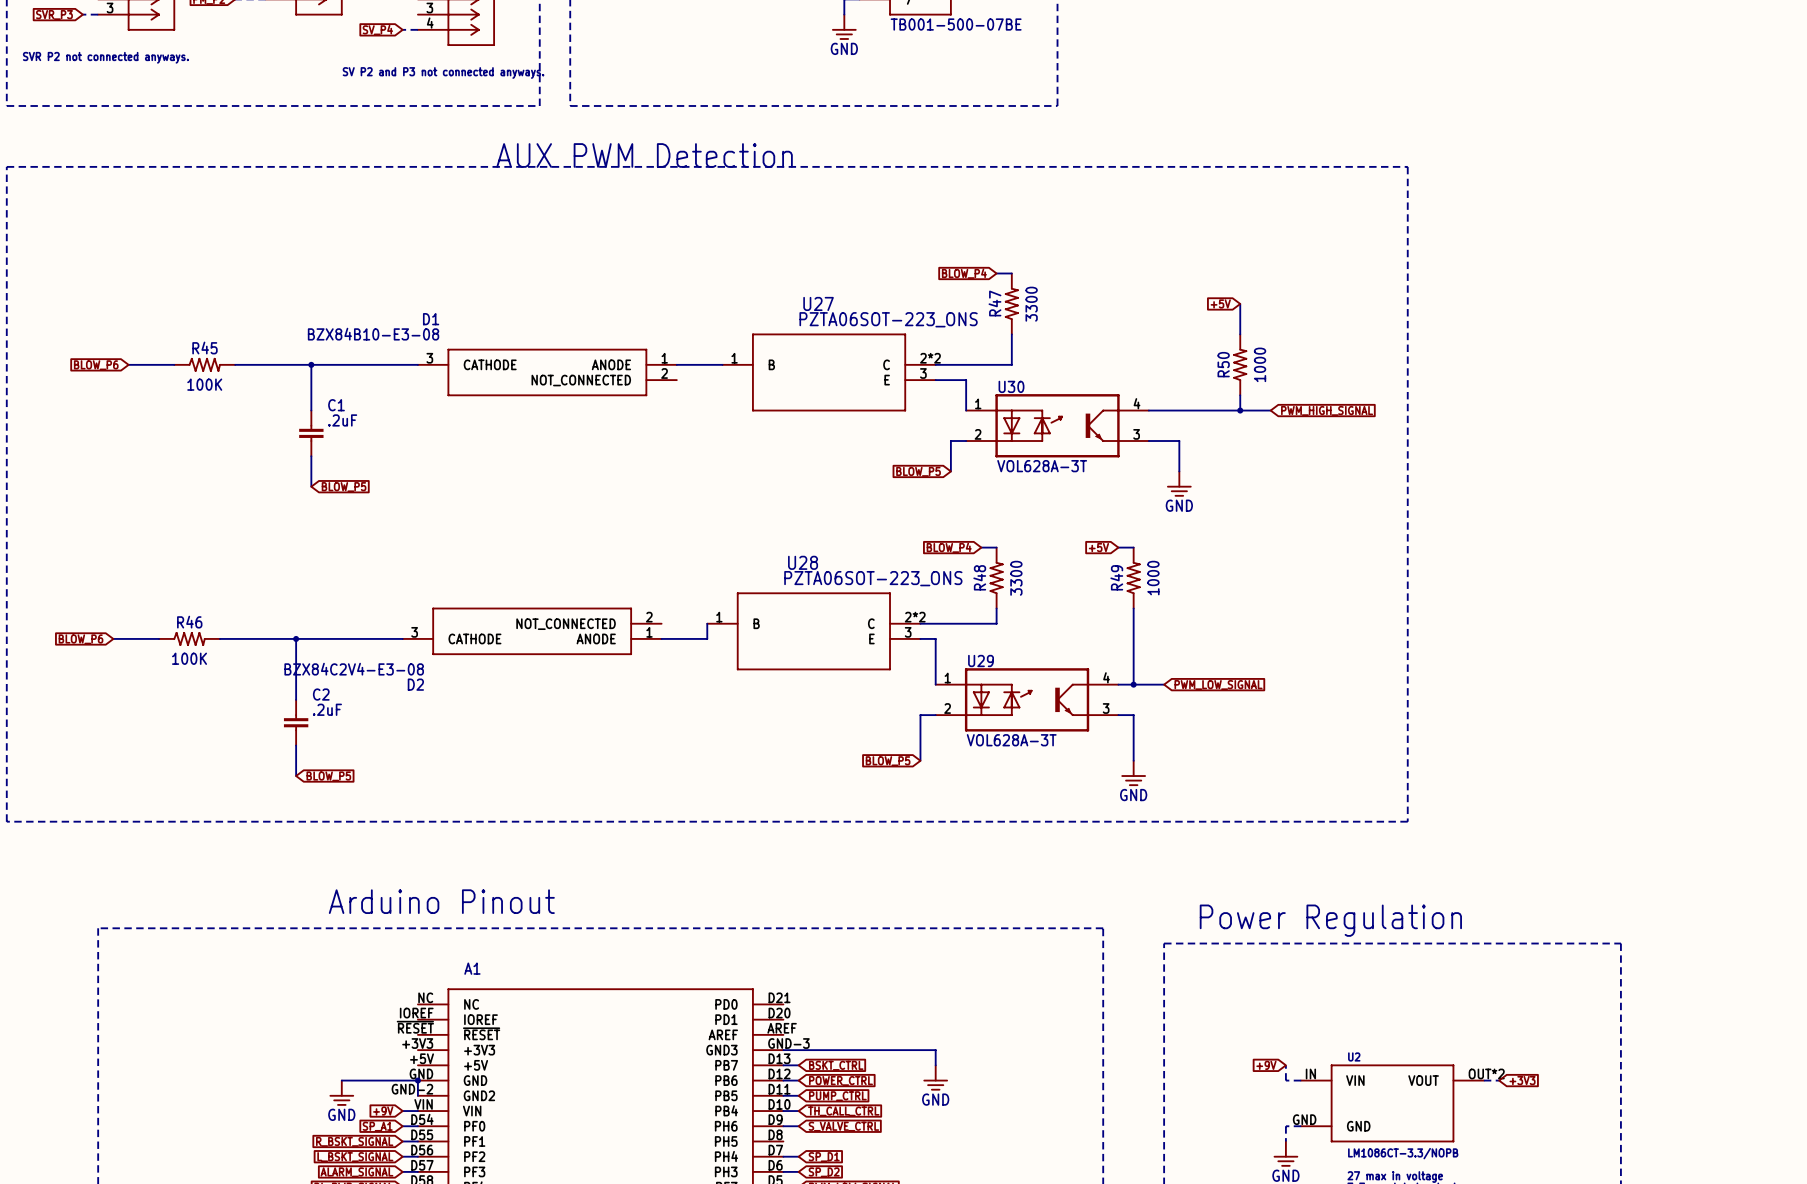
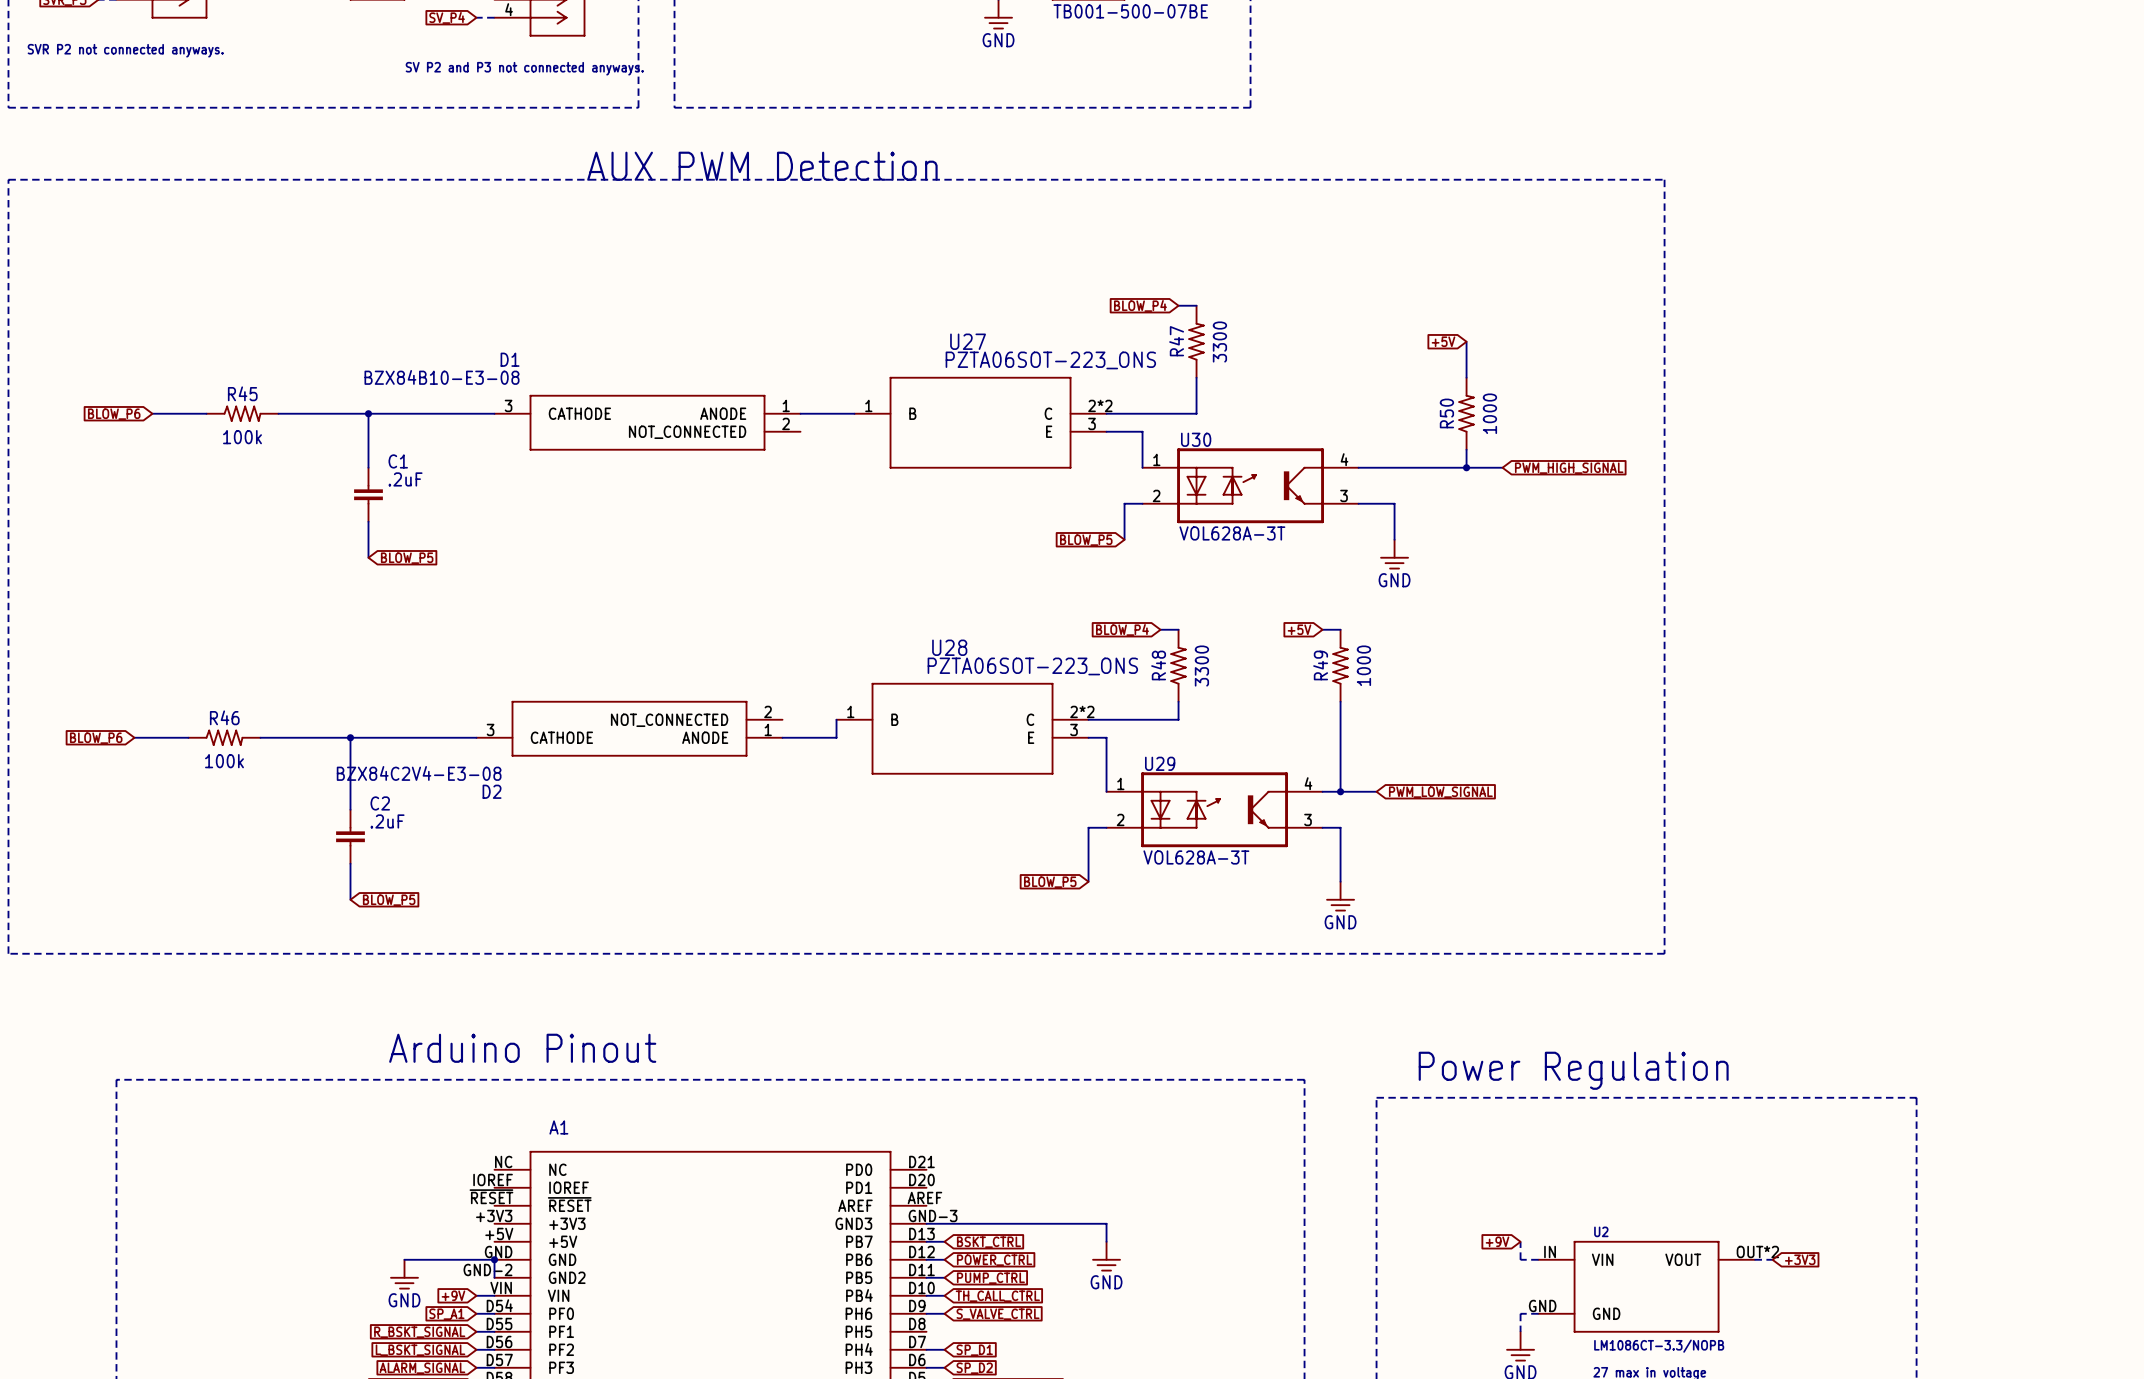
R45 value: 100K (204, 384) -> 100k (242, 437)
R46 value: 100K (189, 658) -> 100k (224, 761)

